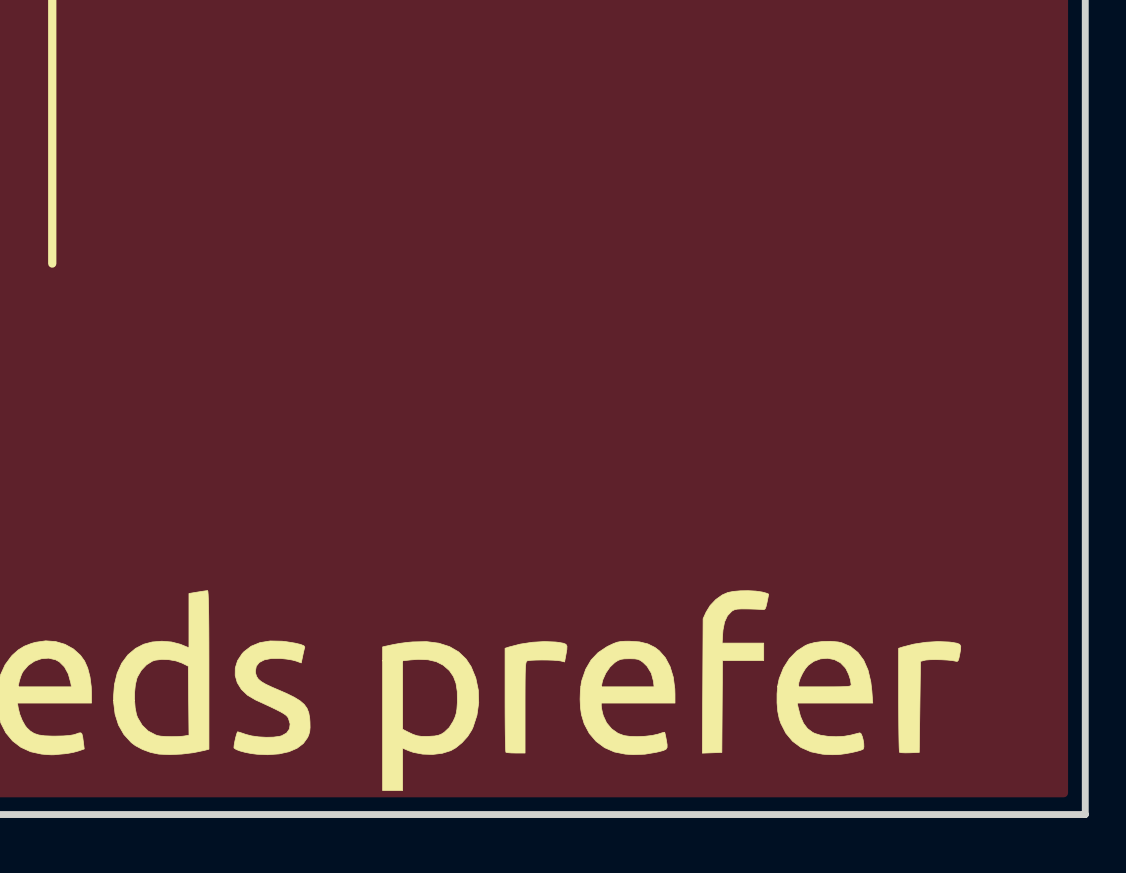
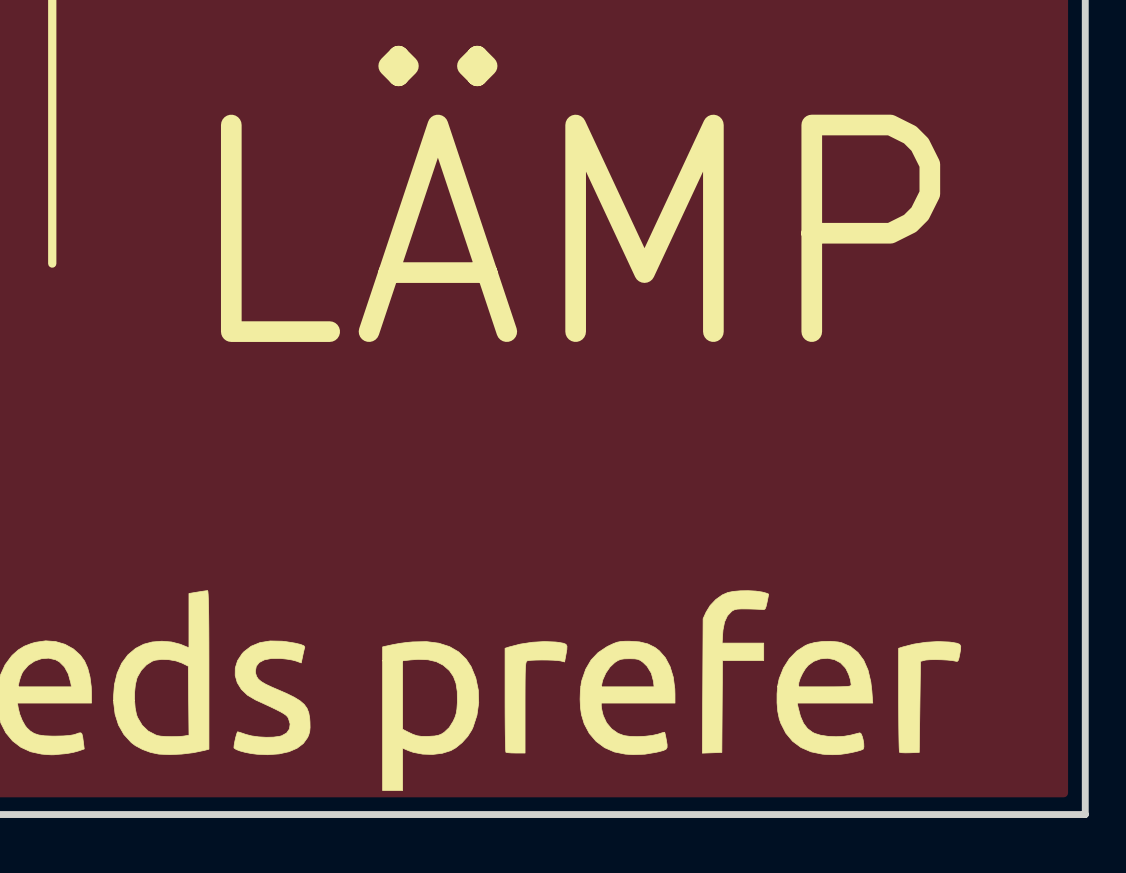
text: none -> LÄMP (580, 193)

